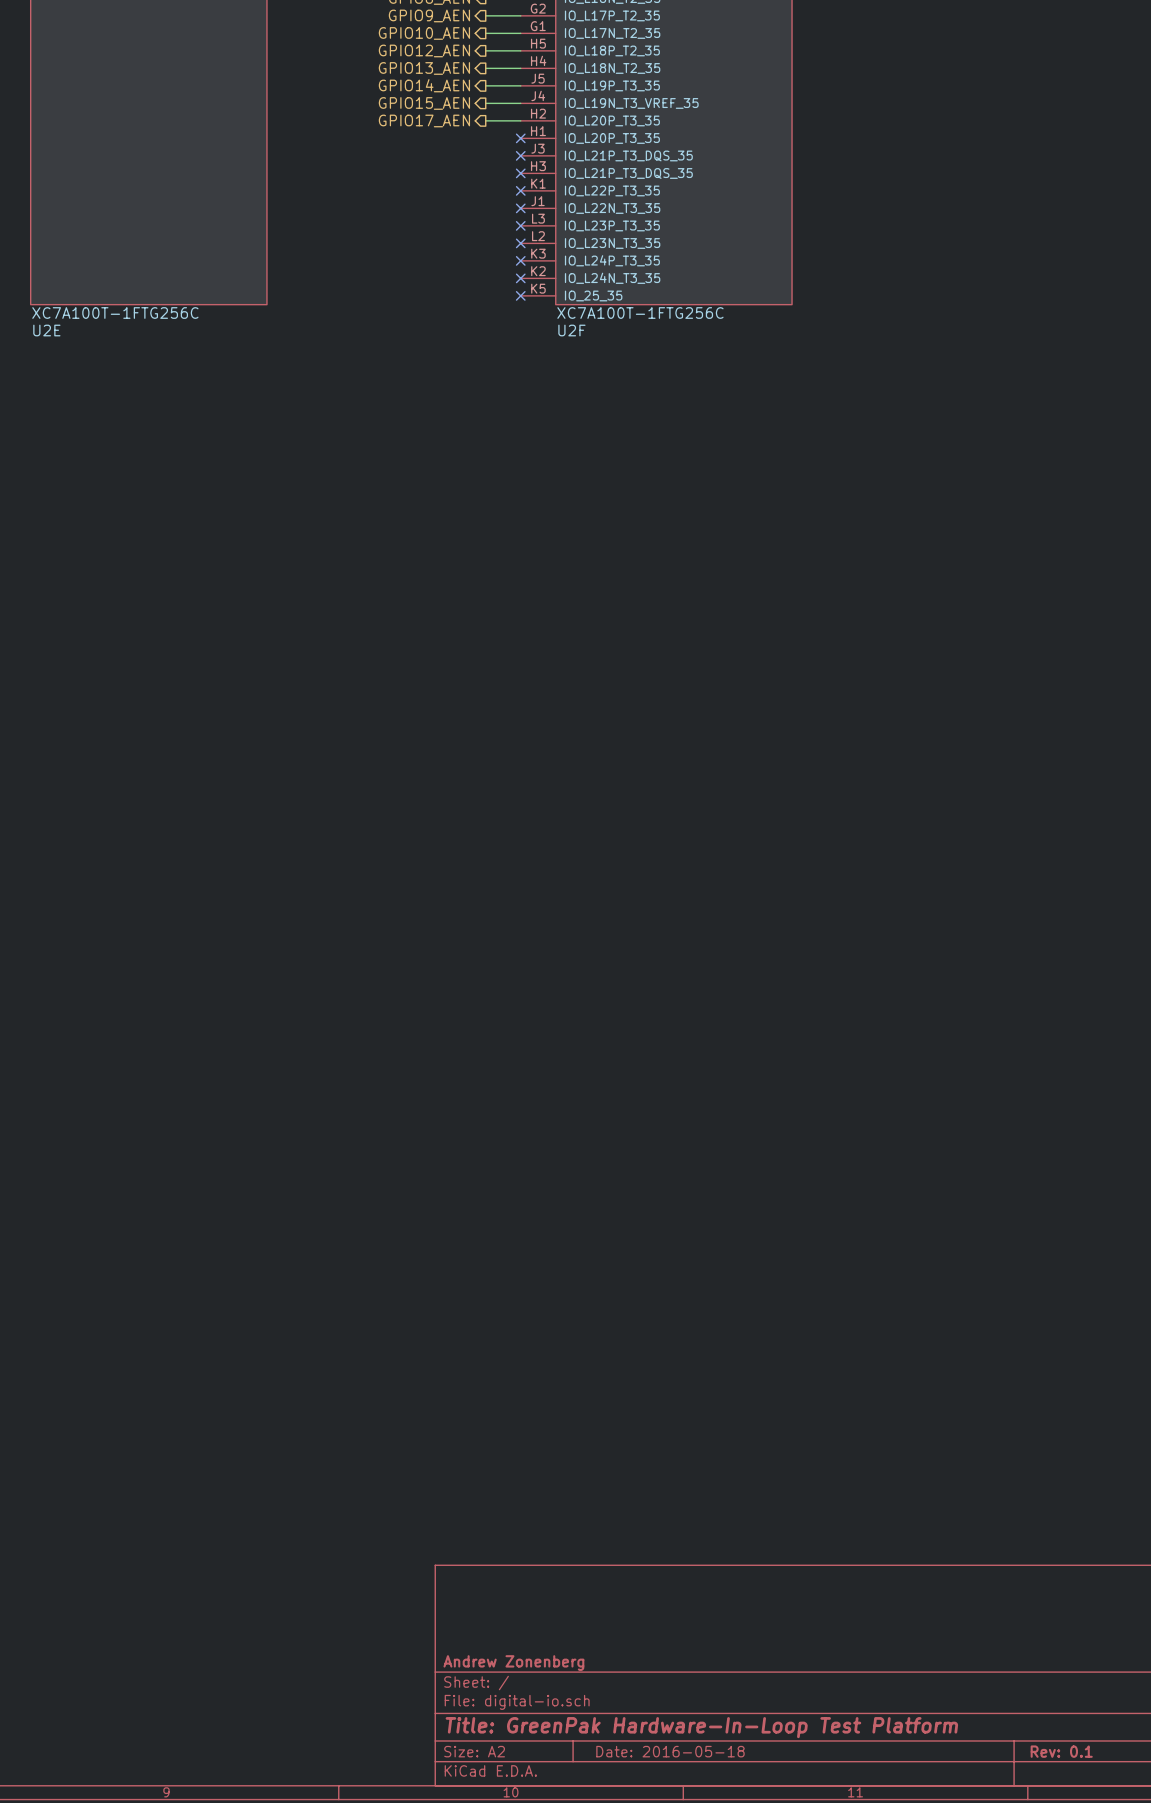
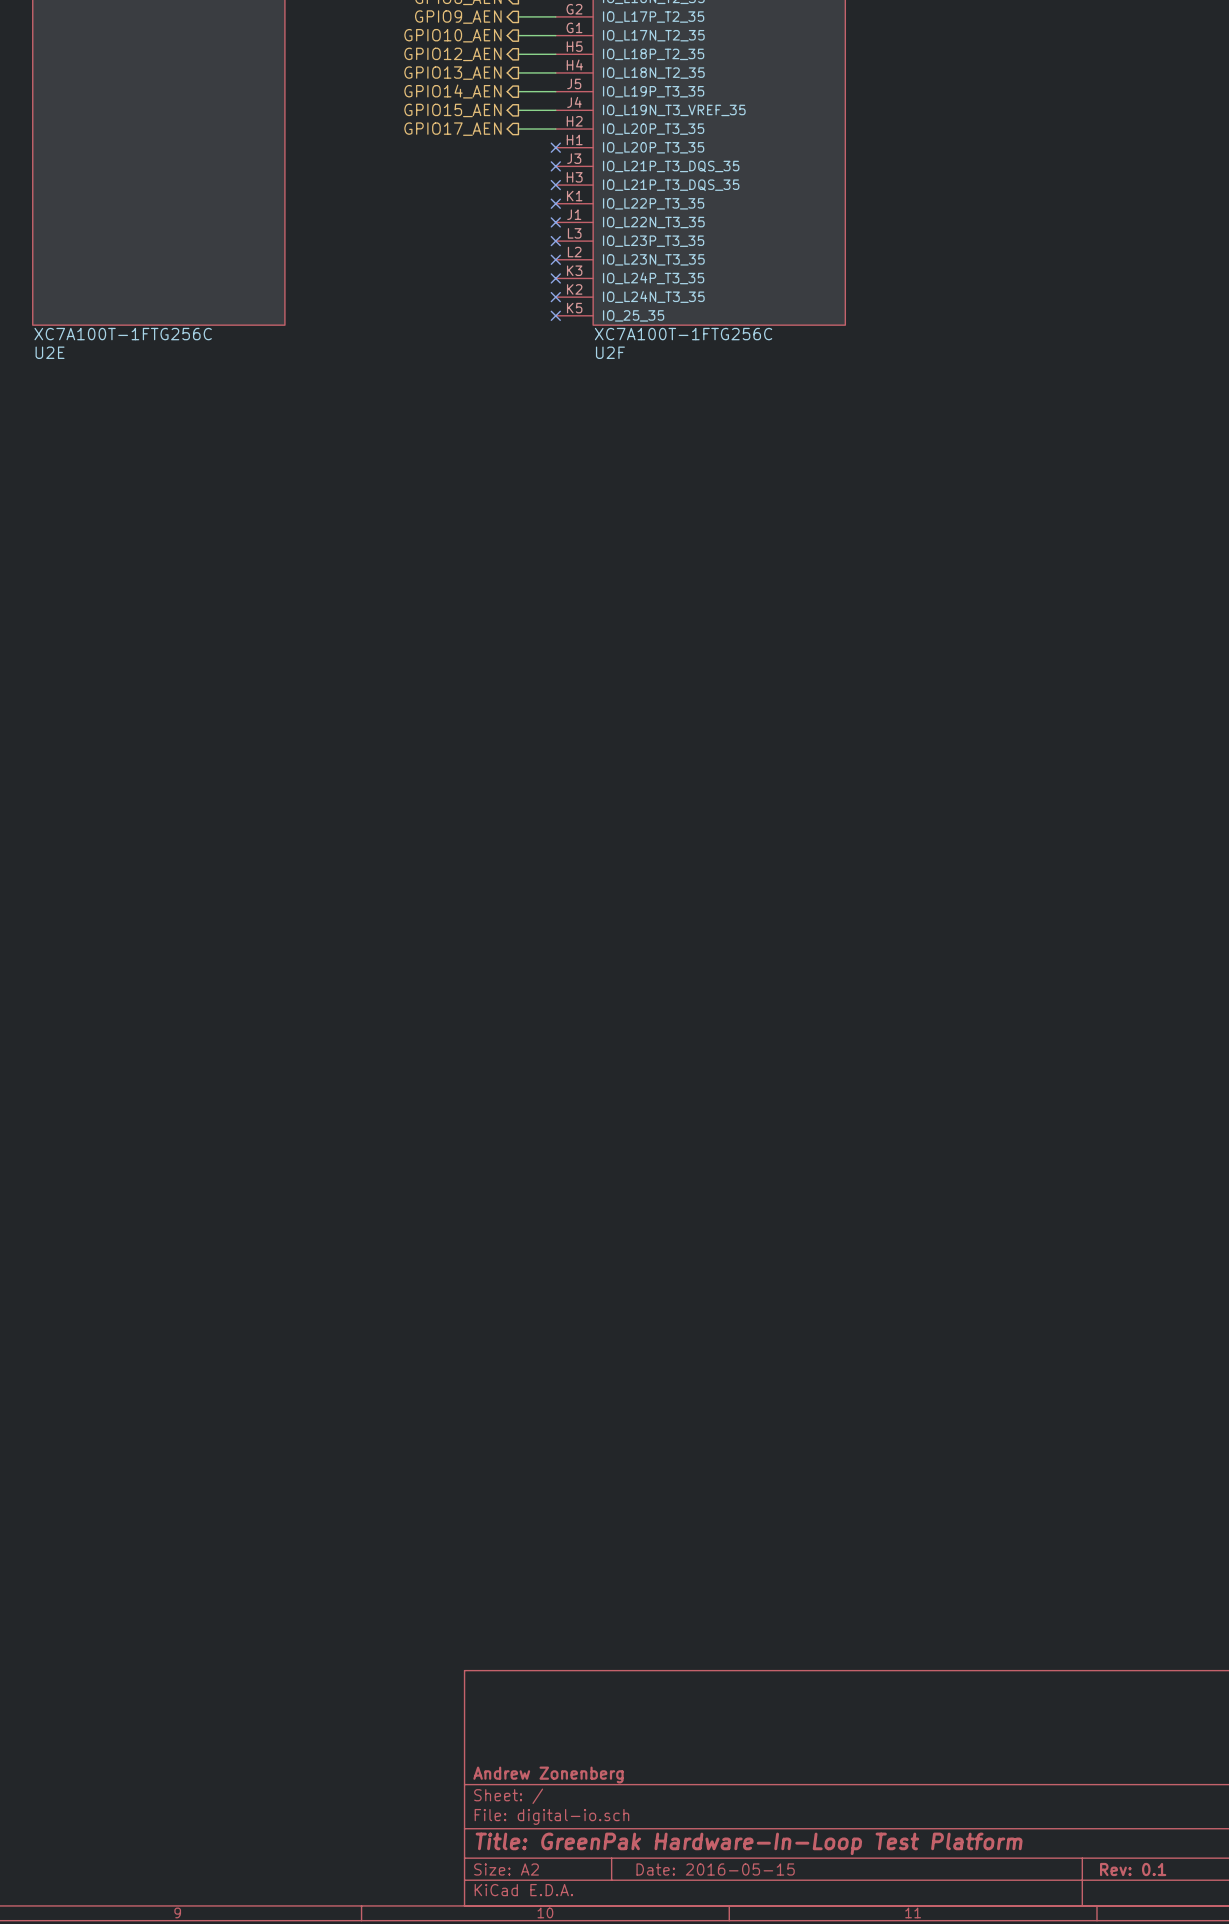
title block: Date: 2016-05-18 (670, 1751) -> Date: 2016-05-15 (715, 1869)

